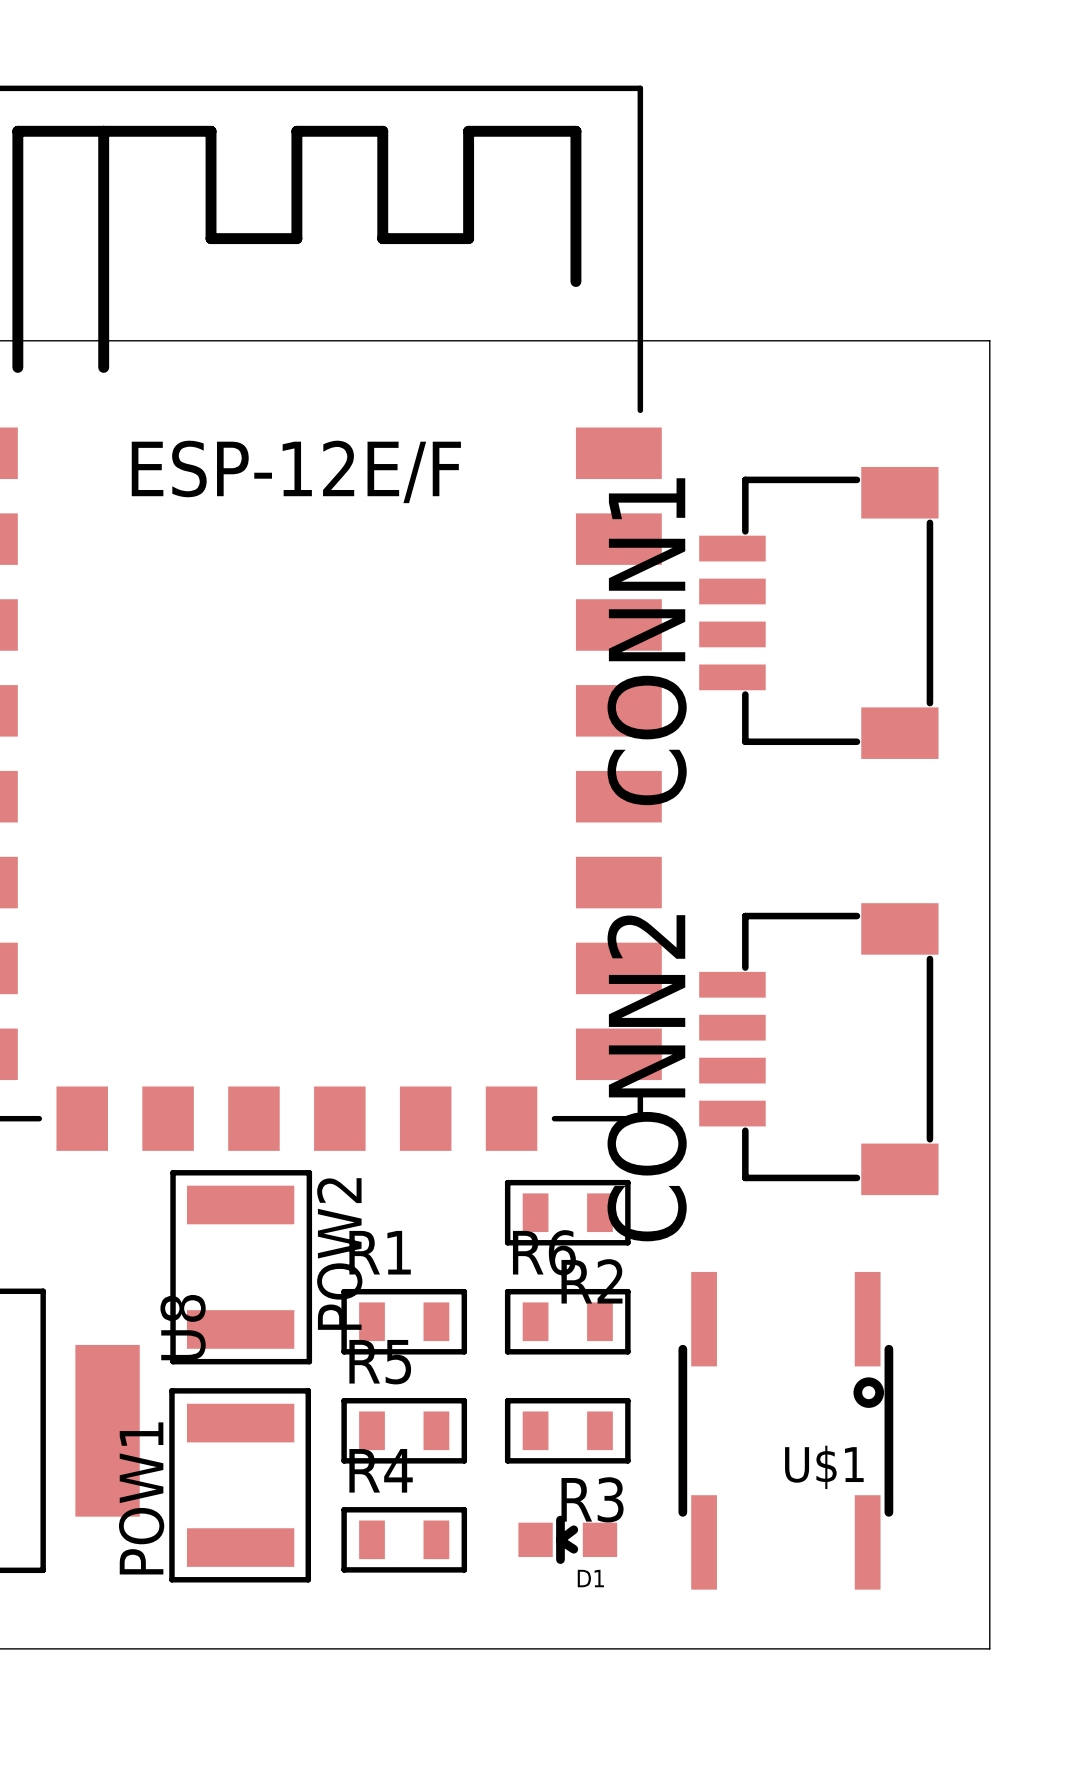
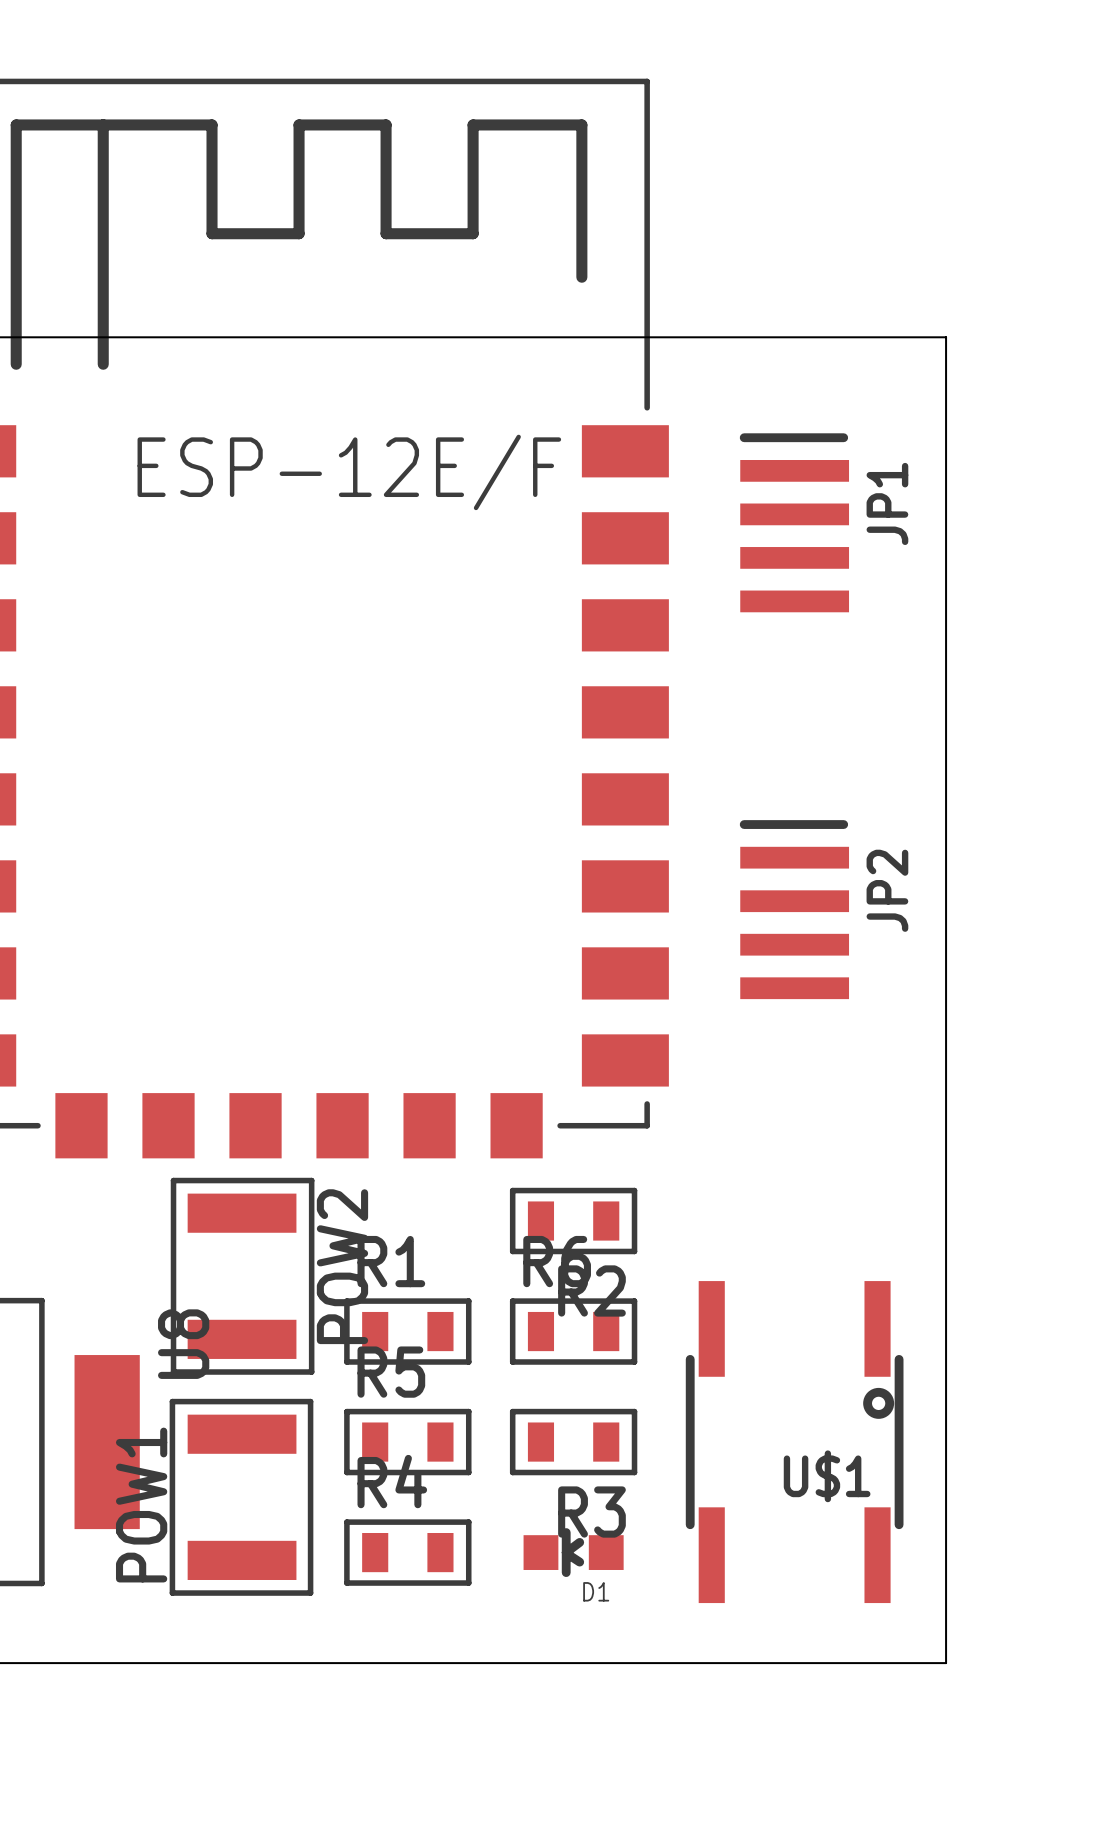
board edge: (935, 340) (989, 340) (989, 1648) (935, 1648) -> (946, 337) (946, 1663)
JP1: none -> (794, 522)
CONN1: (818, 612) -> none
JP2: none -> (794, 909)
CONN2: (818, 1049) -> none

